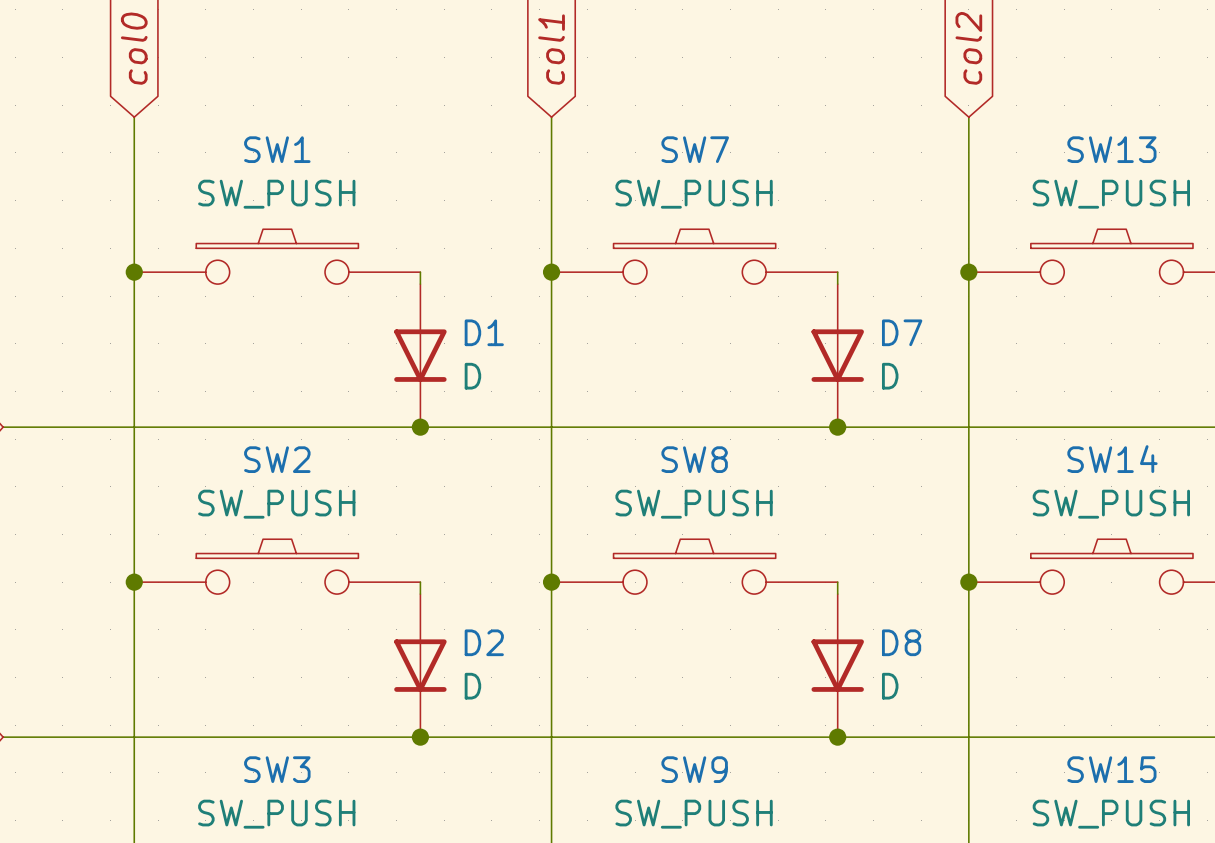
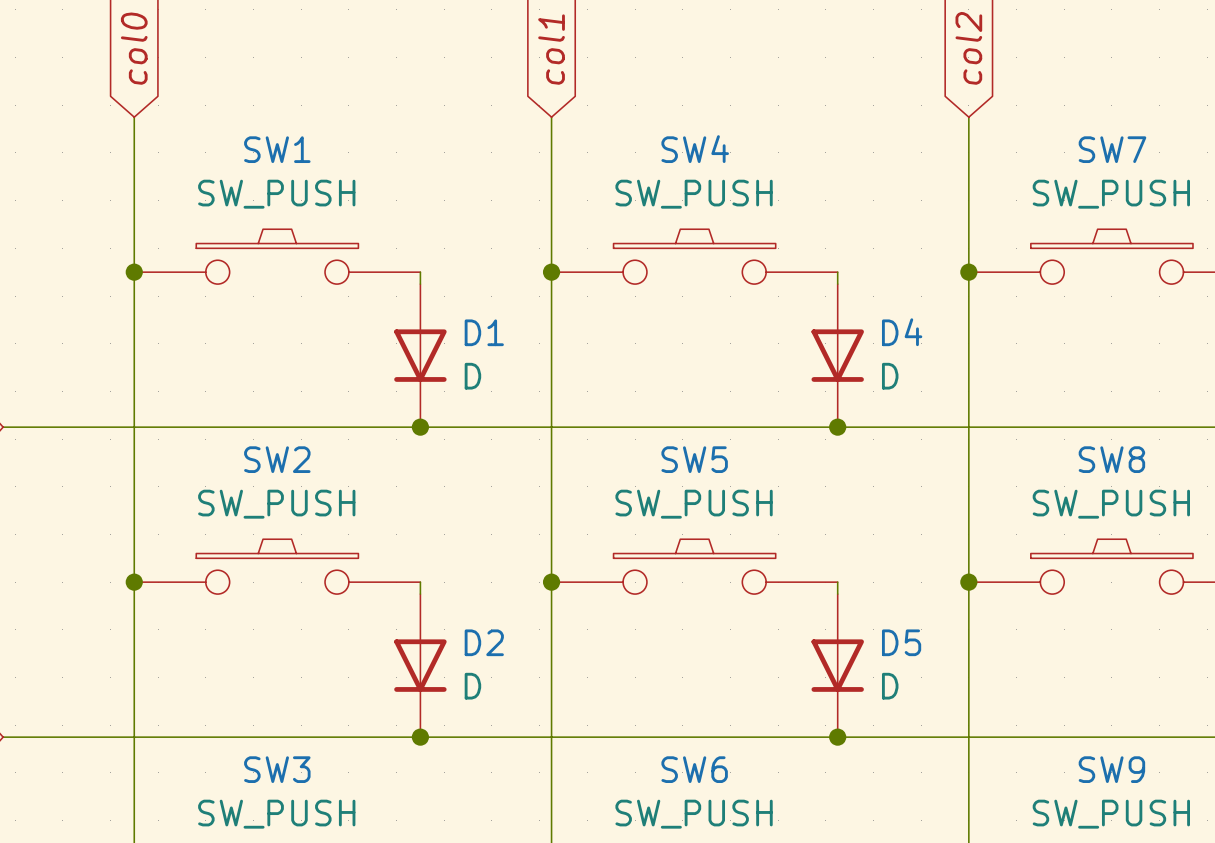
SW7 name: SW7 (695, 149) -> SW4 (695, 149)
SW13 name: SW13 (1111, 149) -> SW7 (1112, 149)
D7 name: D7 (902, 332) -> D4 (902, 332)
SW8 name: SW8 (694, 459) -> SW5 (694, 459)
SW14 name: SW14 (1112, 459) -> SW8 (1111, 459)
D8 name: D8 (901, 642) -> D5 (901, 642)
SW9 name: SW9 (694, 769) -> SW6 (694, 769)
SW15 name: SW15 (1111, 769) -> SW9 (1111, 769)

